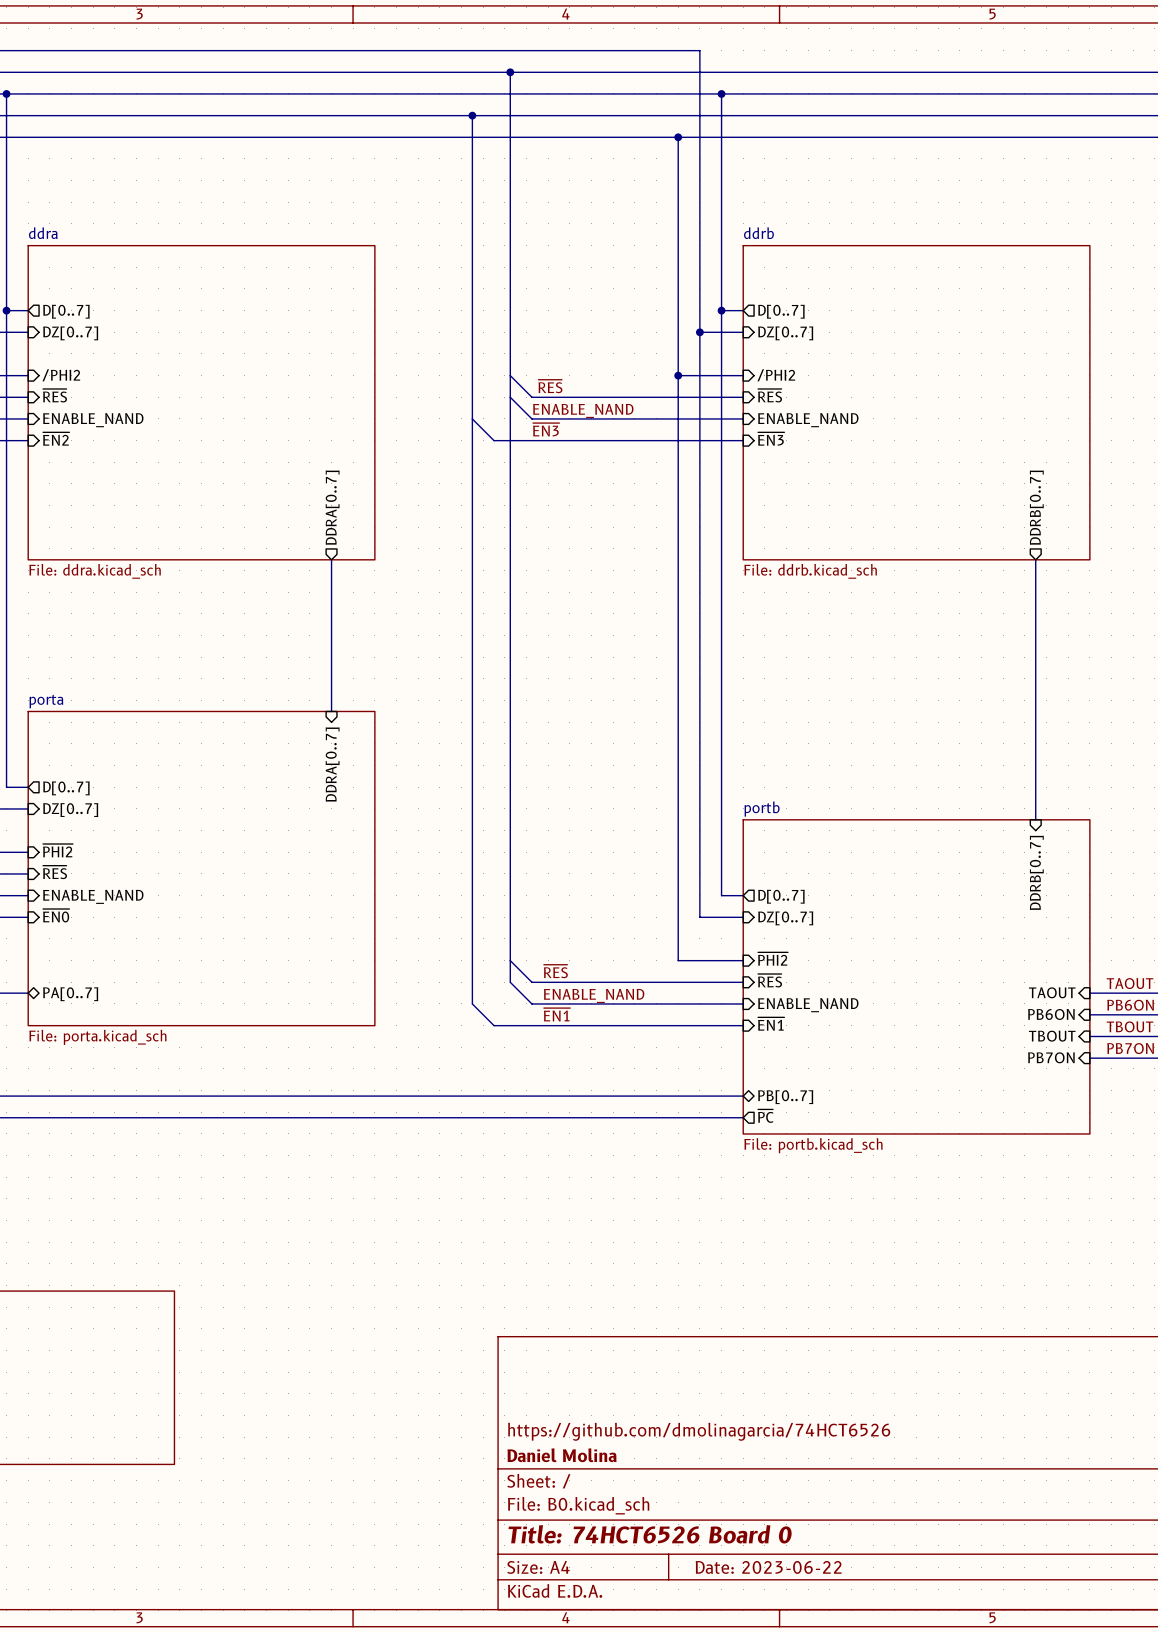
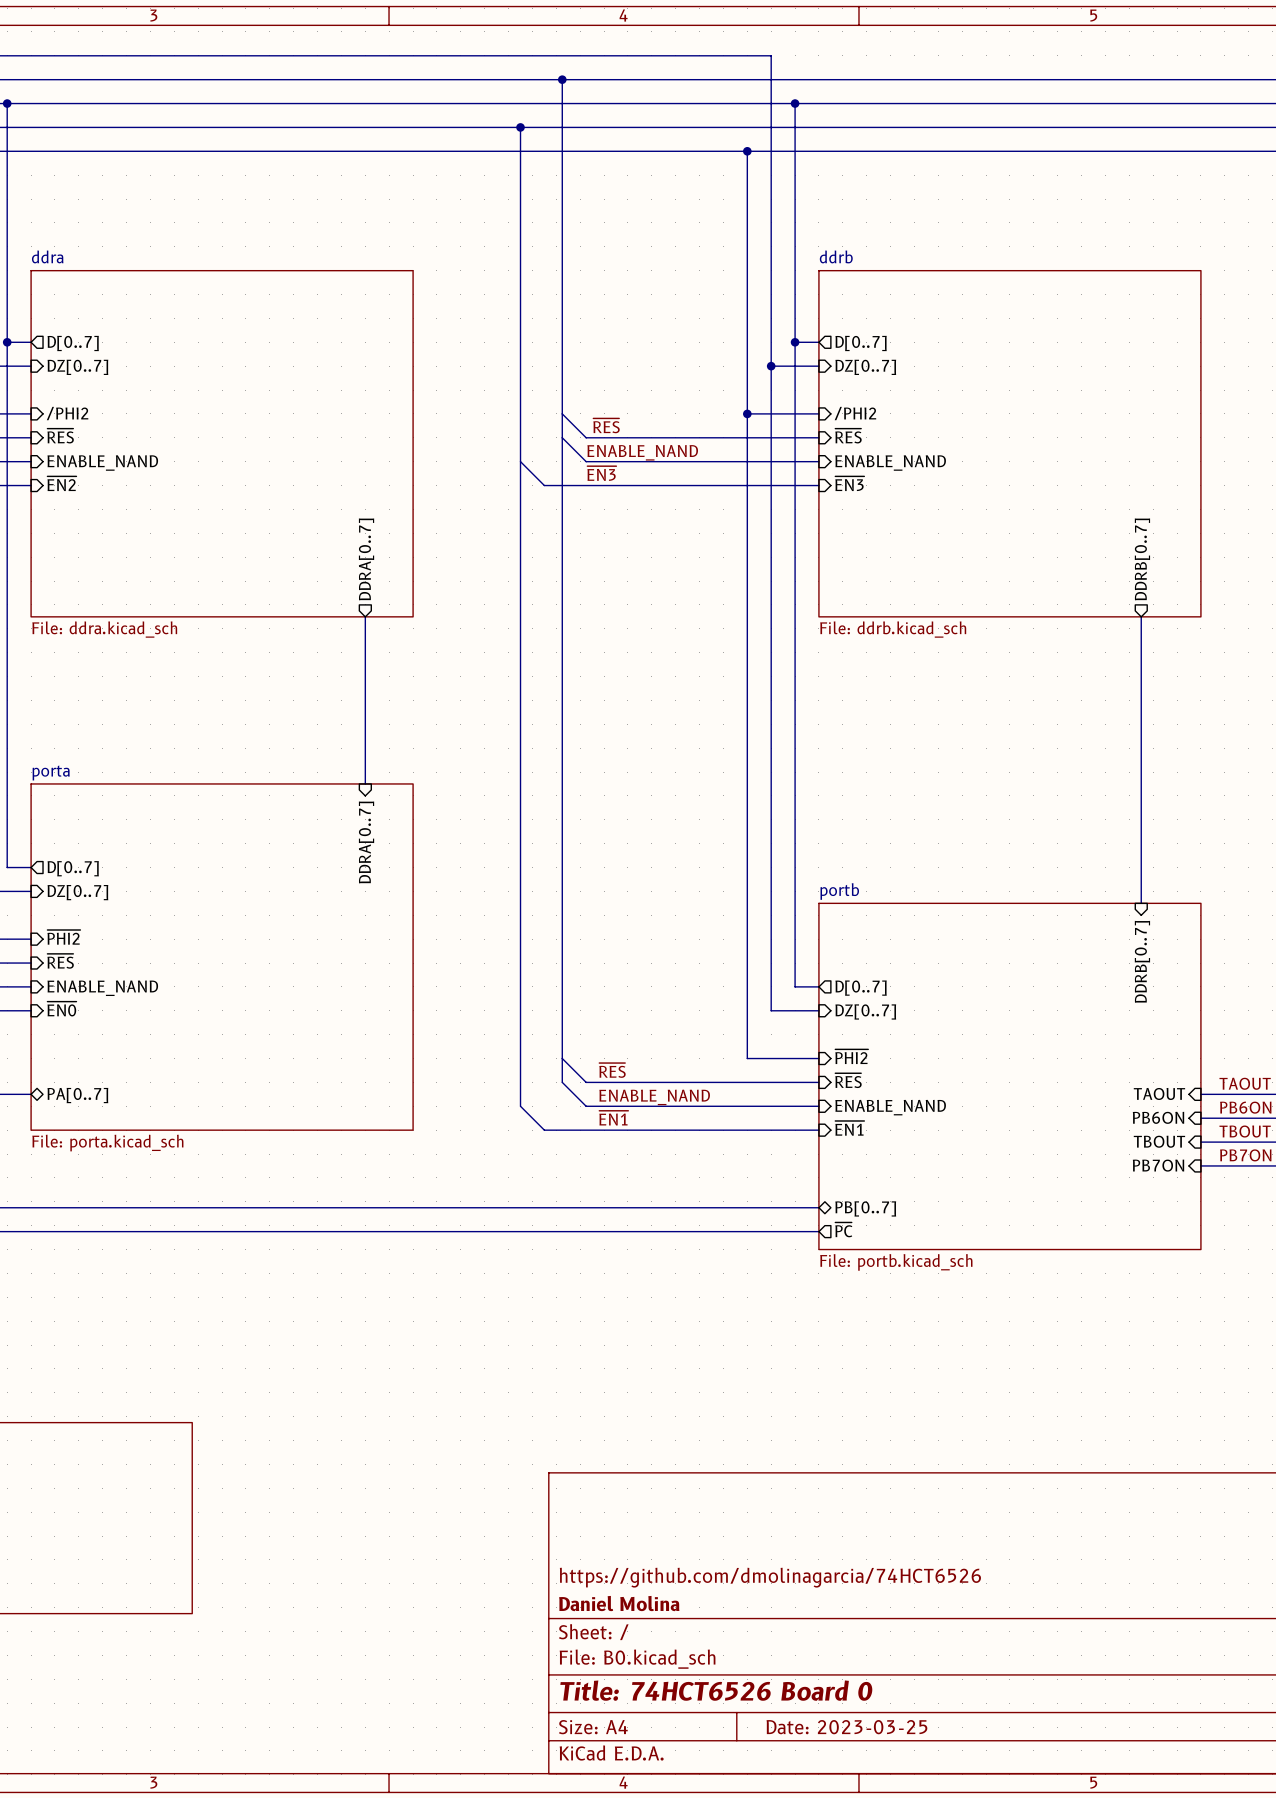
title block: Date: 2023-06-22 (768, 1567) -> Date: 2023-03-25 (846, 1727)

